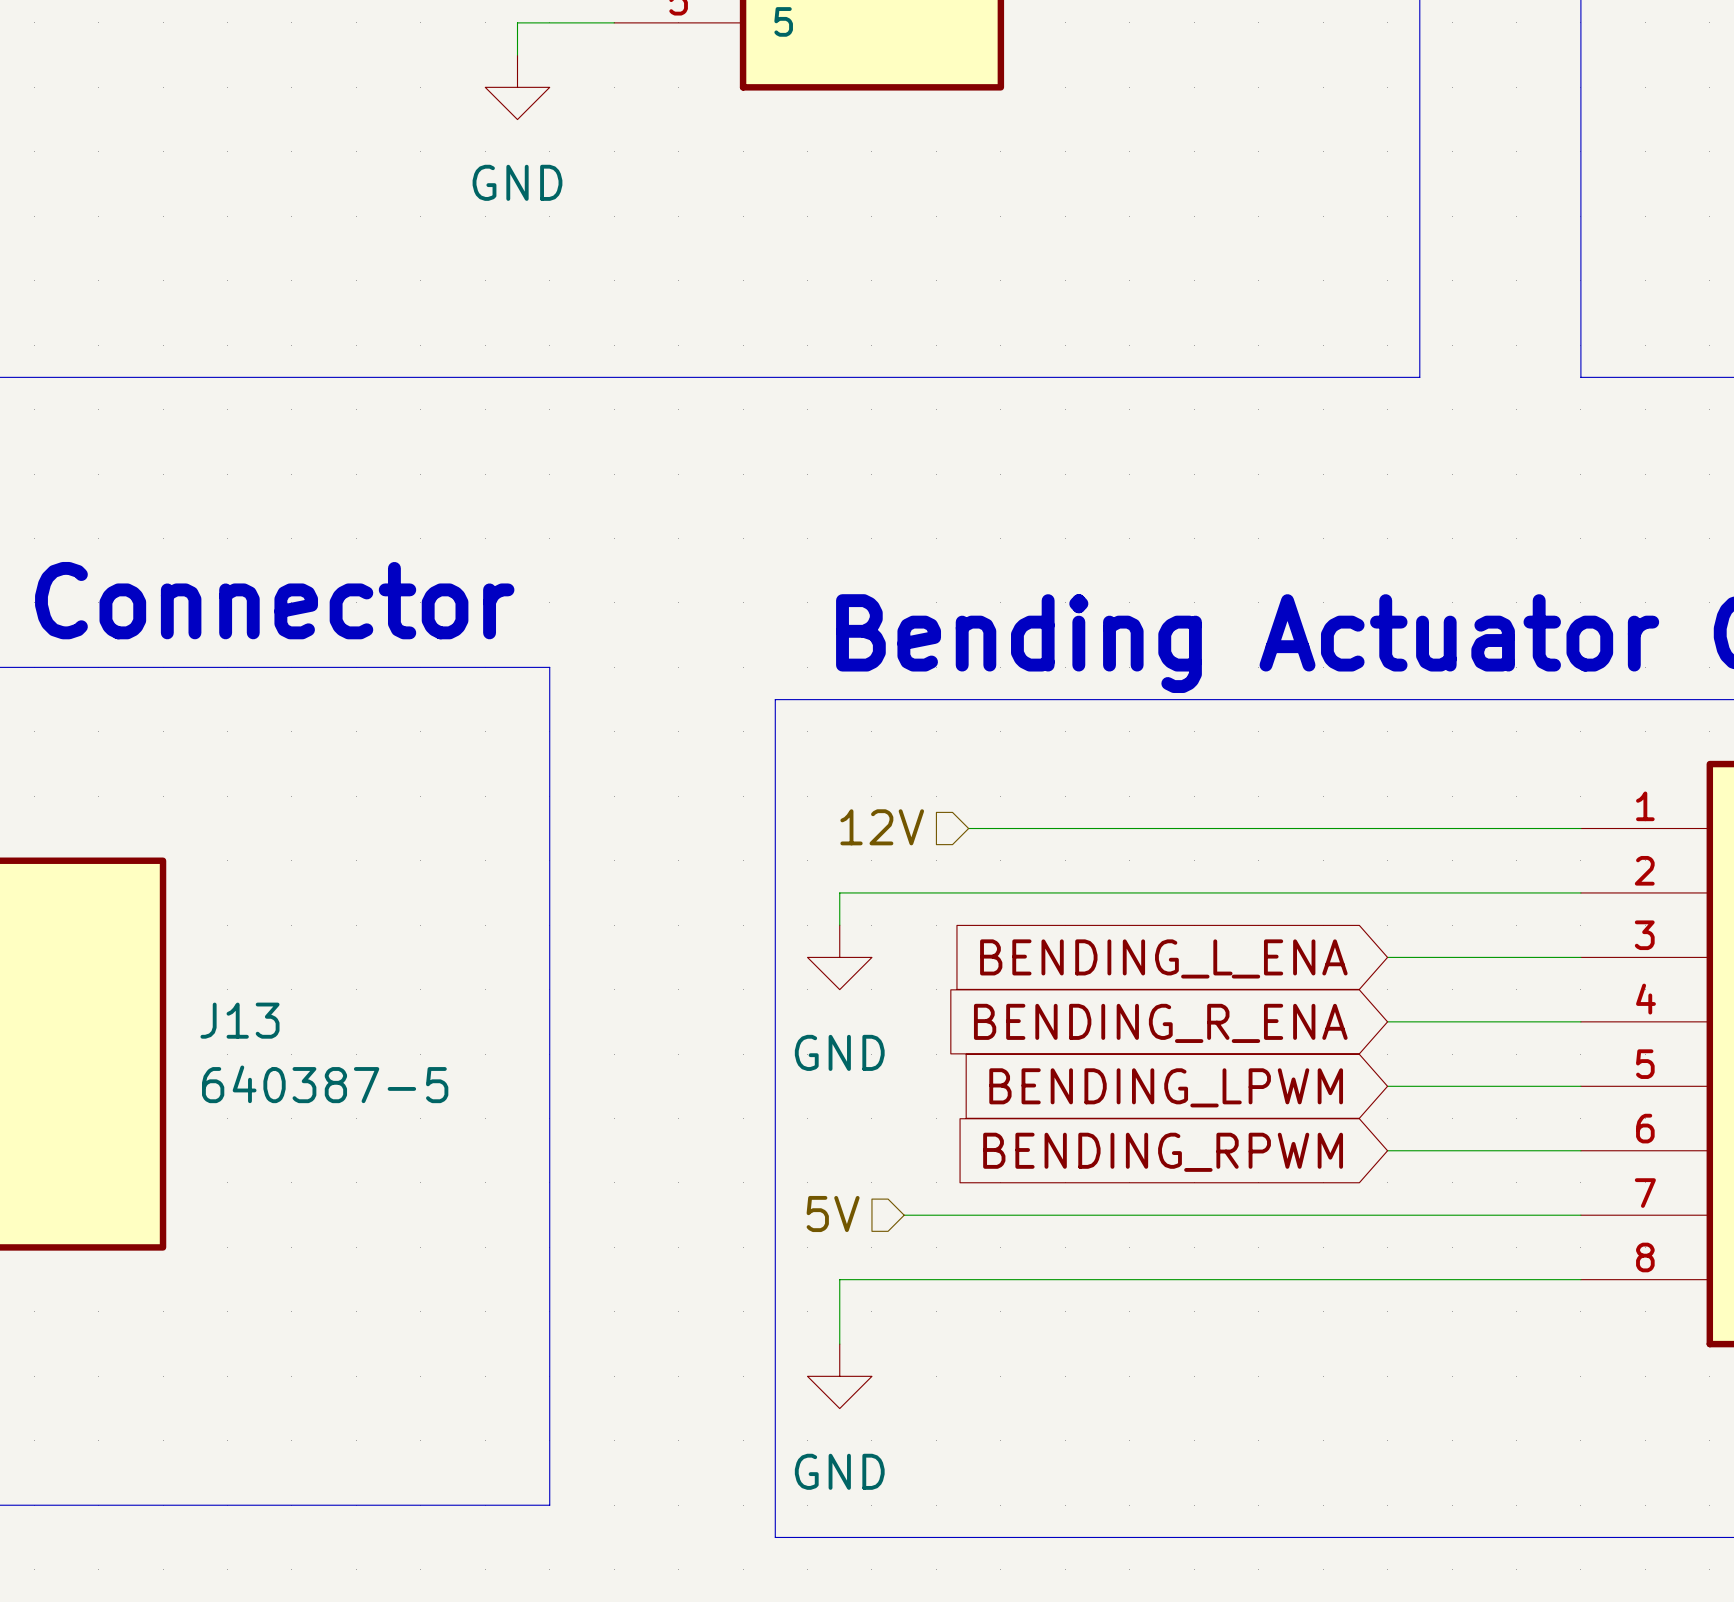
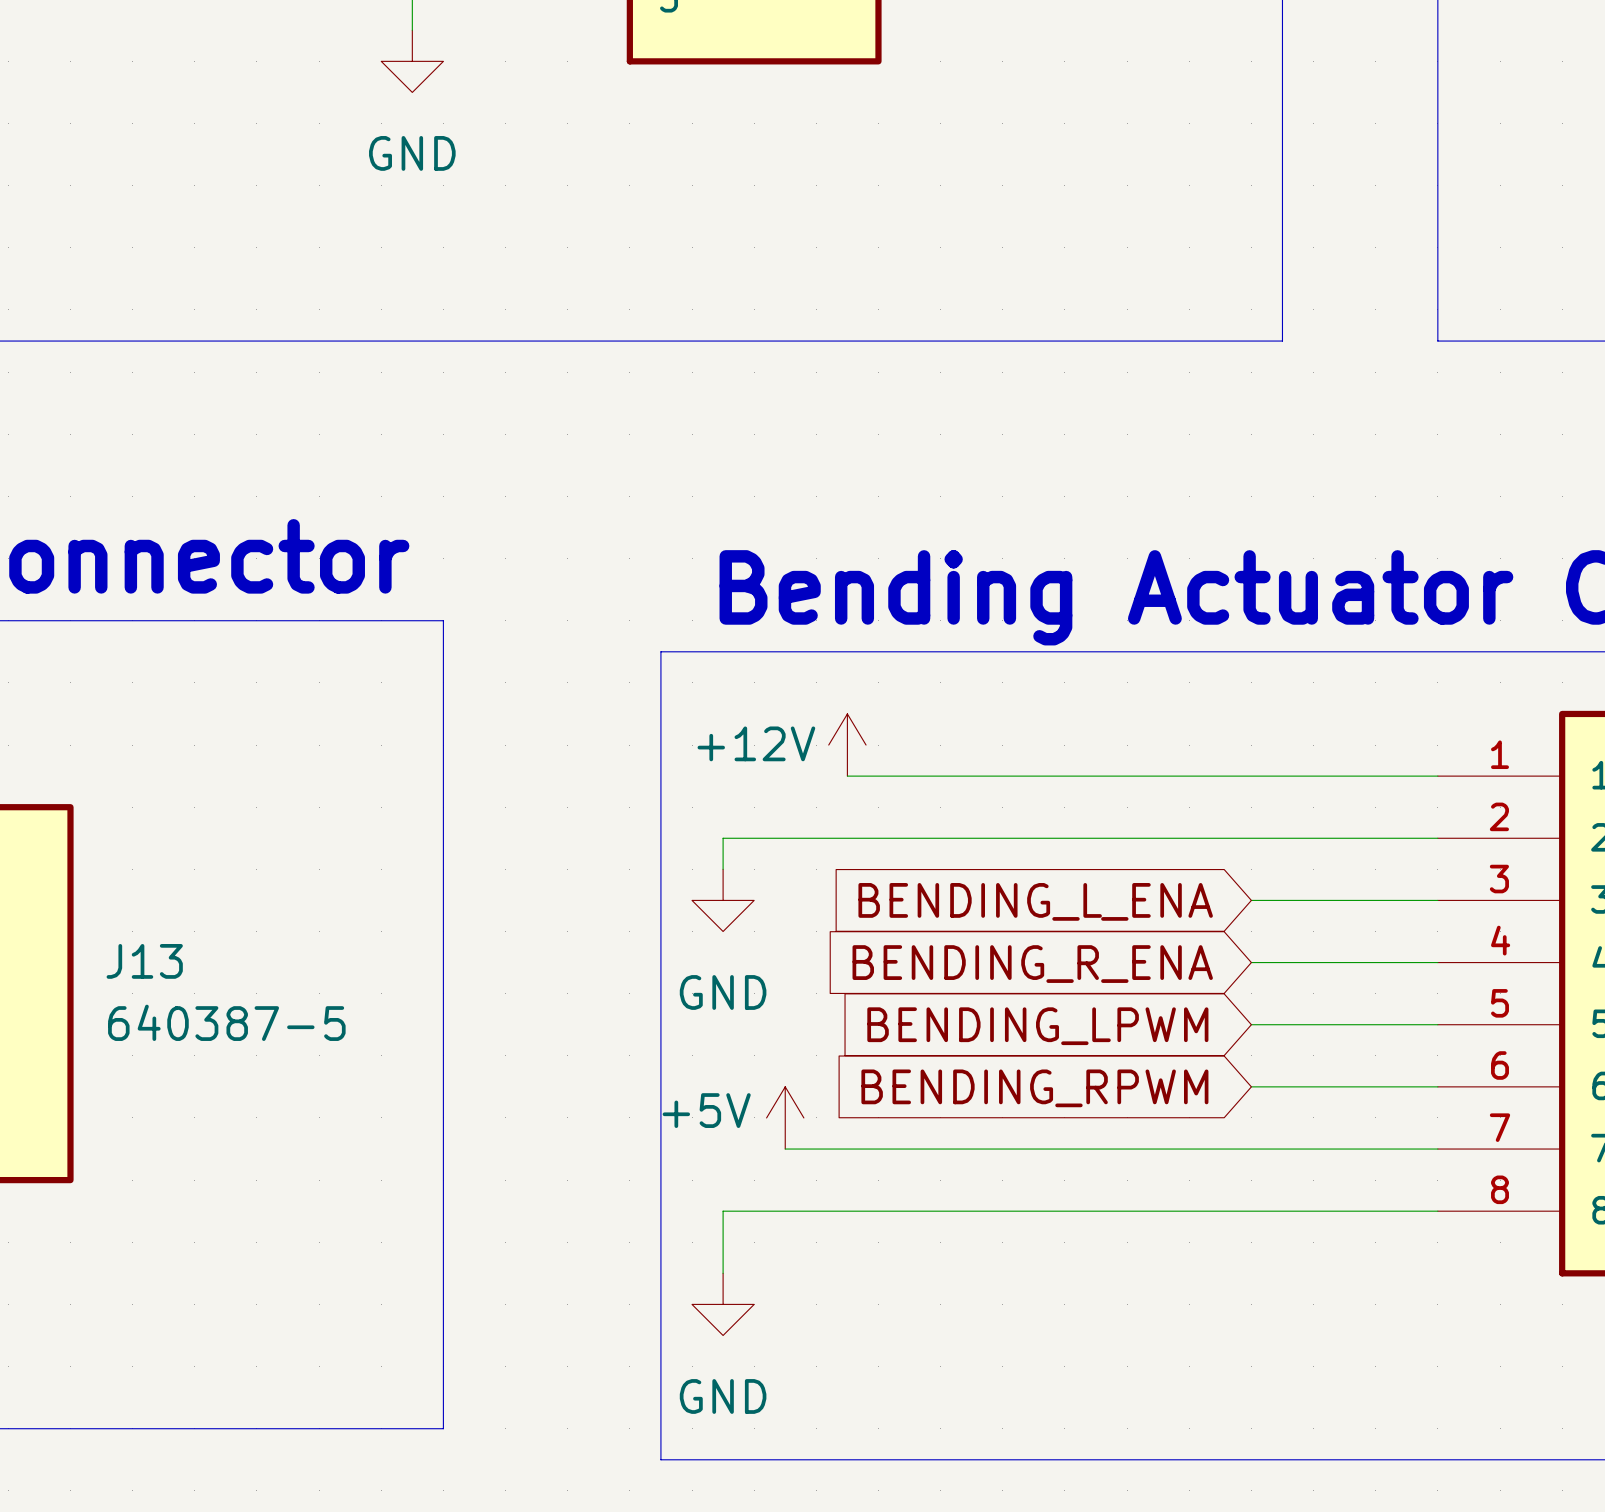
power symbol: none -> +12V (847, 745)
hierarchical label: 12V (882, 827) -> none
power symbol: none -> +5V (785, 1117)
hierarchical label: 5V (833, 1214) -> none

